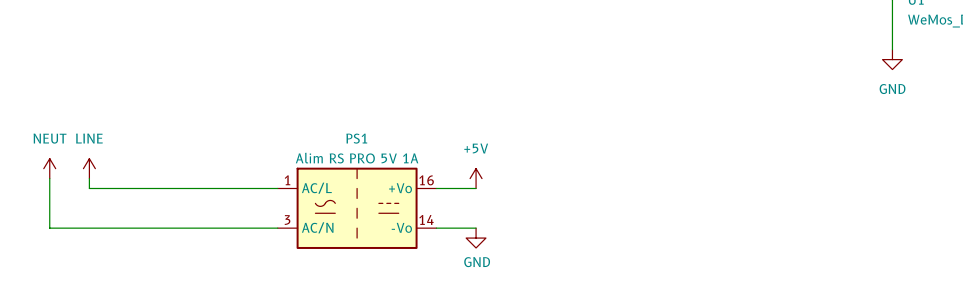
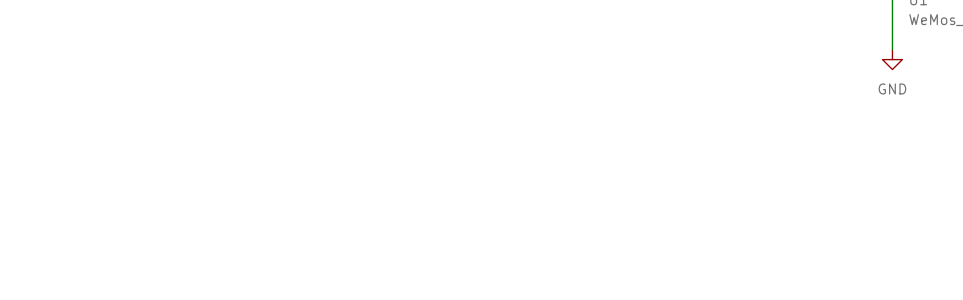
power symbol: NEUT (49, 168) -> none
power symbol: LINE (89, 168) -> none
wire: (49, 178) (49, 228) (277, 228) -> none
wire: (89, 178) (89, 188) (277, 188) -> none
power symbol: +5V (476, 178) -> none
wire: (436, 188) (476, 188) -> none
PS1: Alim RS PRO 5V 1A (357, 208) -> none
wire: (436, 228) (476, 228) -> none
power symbol: GND (476, 238) -> none

